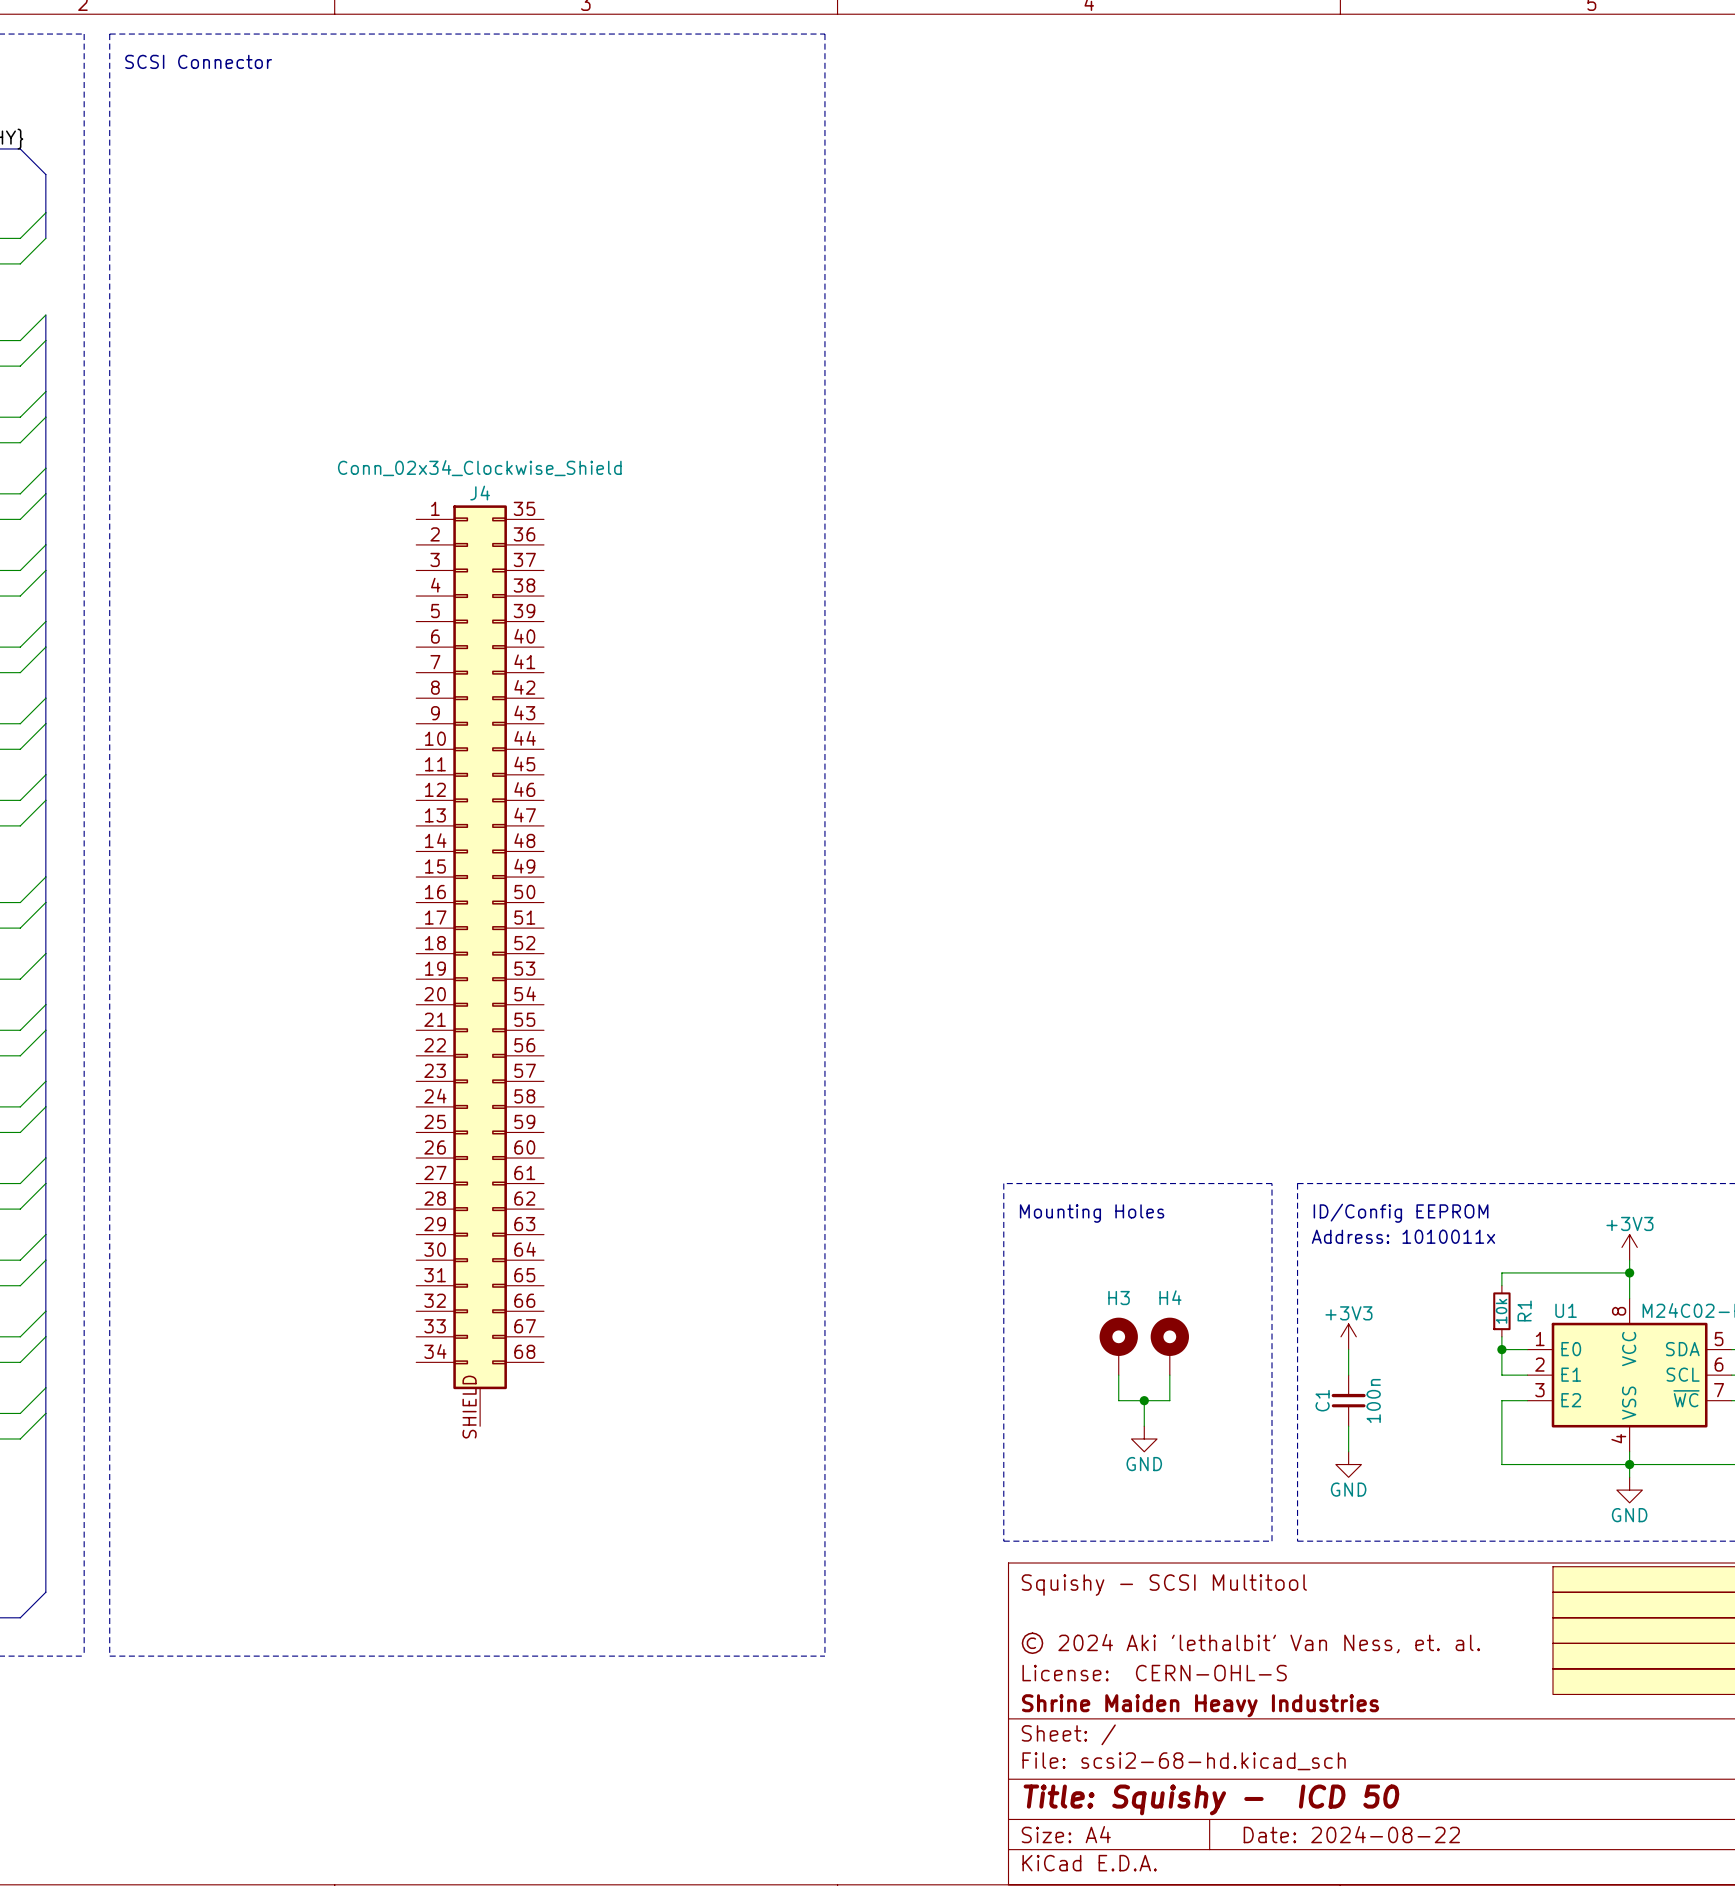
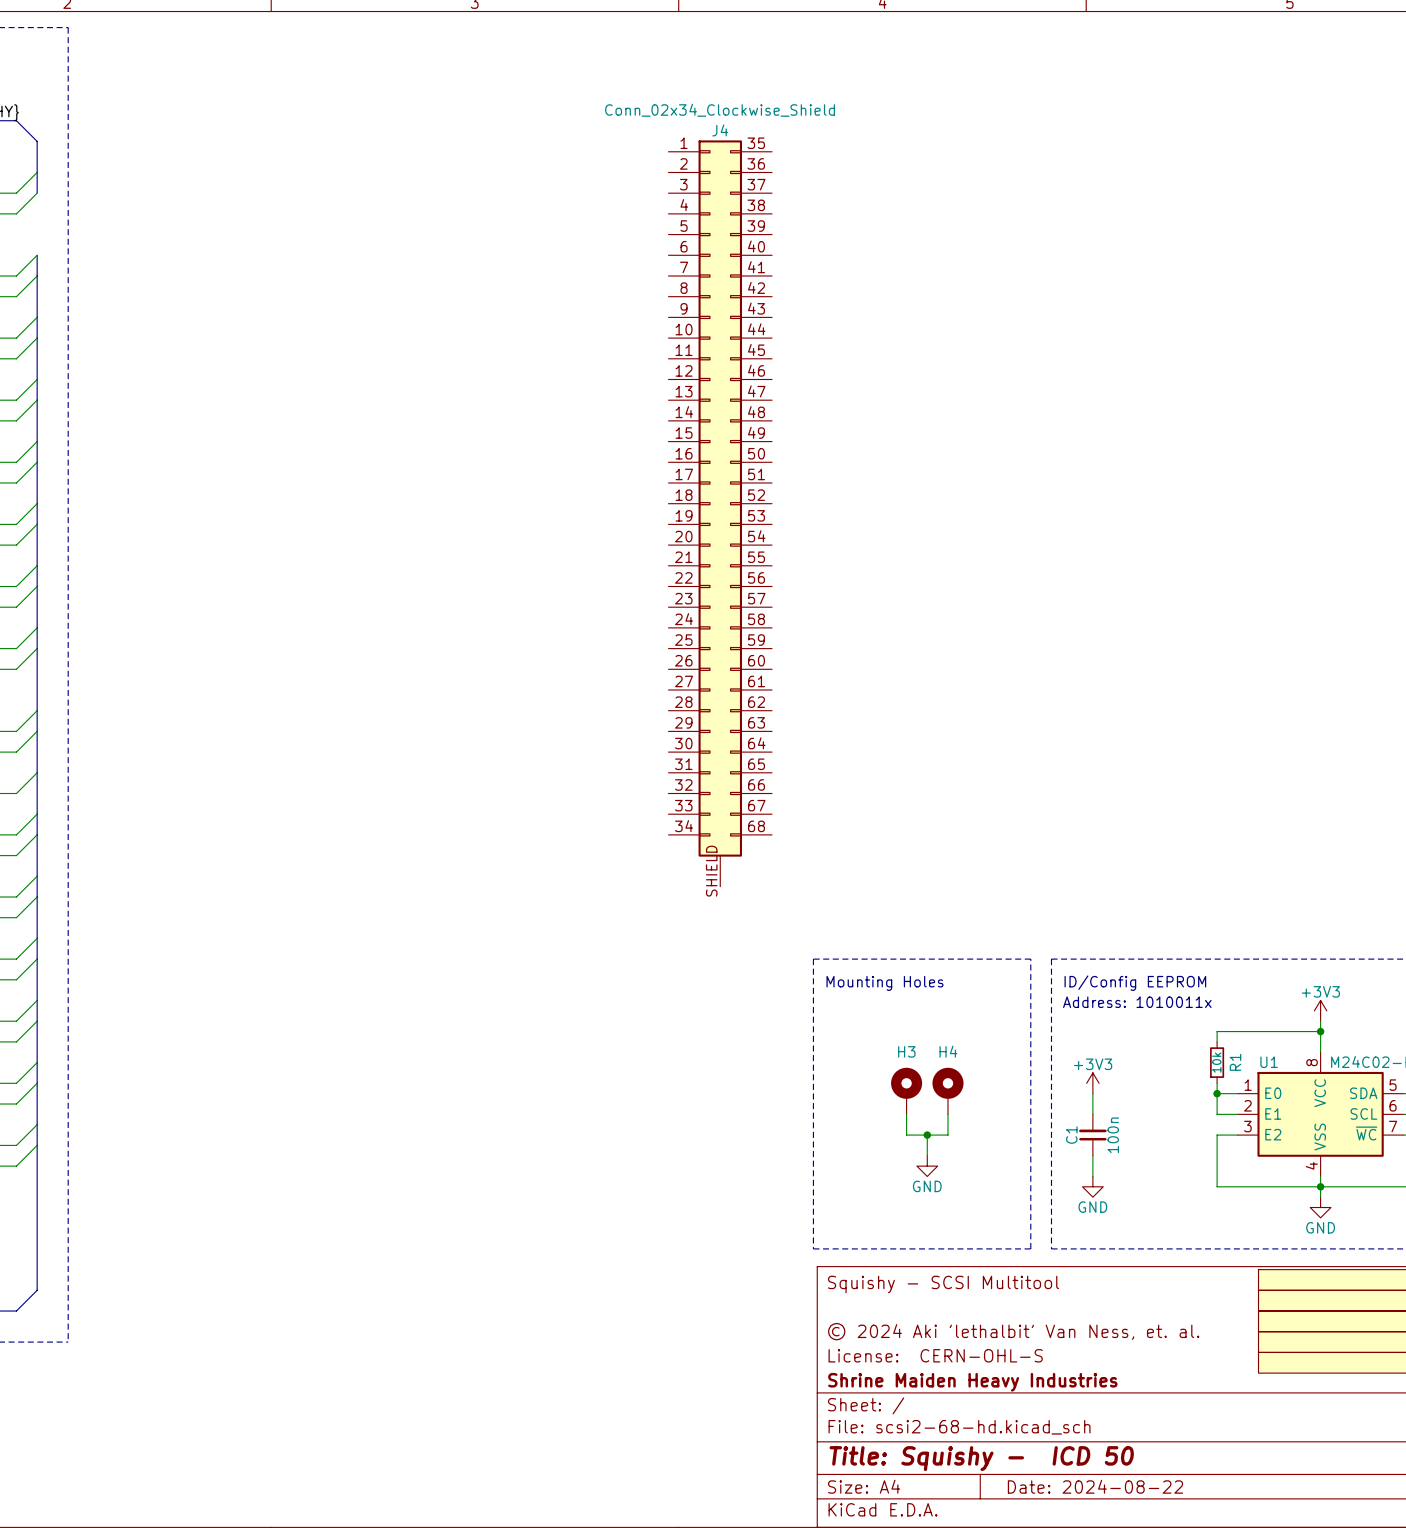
line: (109, 34) (109, 1656) (824, 1656) (824, 34) (109, 34) -> none
text: SCSI Connector (198, 61) -> none
J4 position: (480, 965) -> (720, 513)

